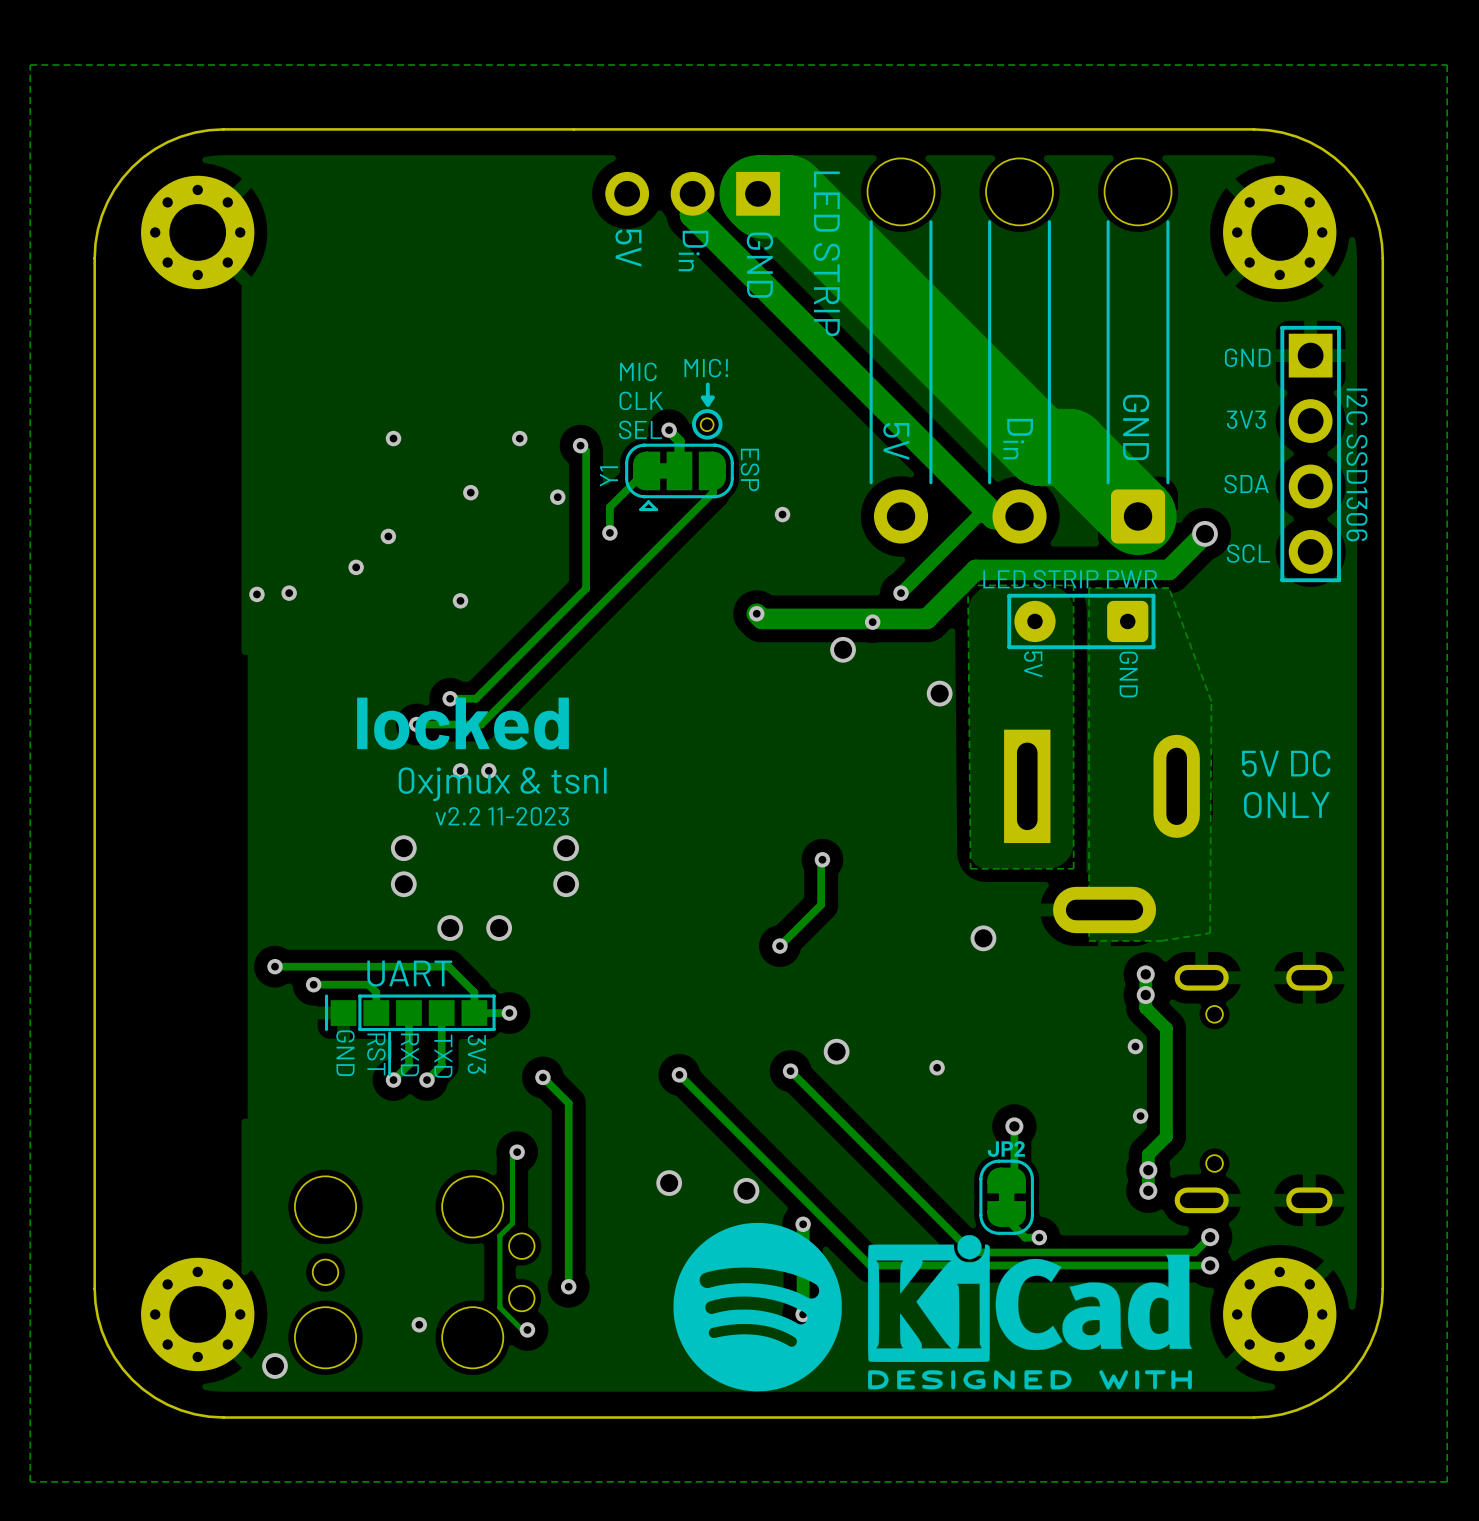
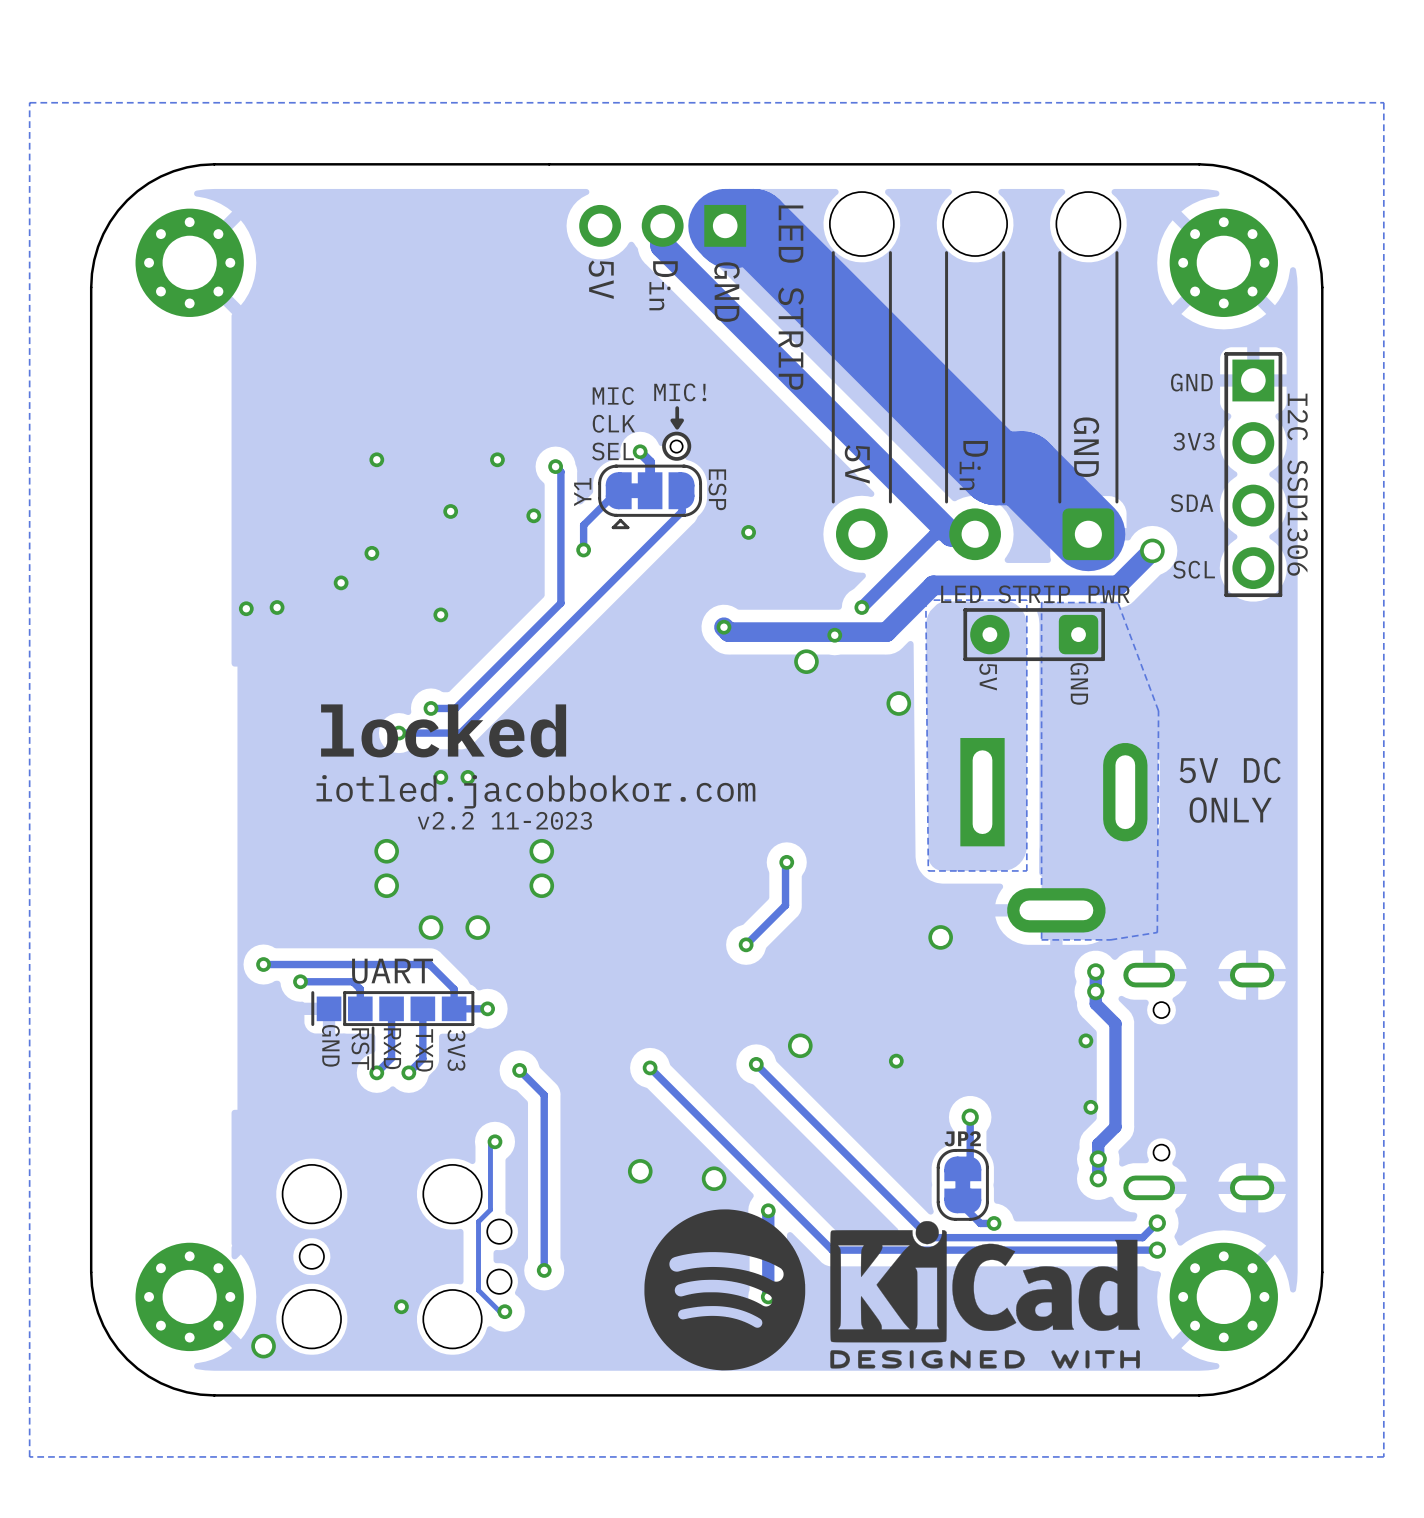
text: 0xjmux & tsnl (502, 784) -> none
text: none -> iotled.jacobbokor.com (535, 791)

